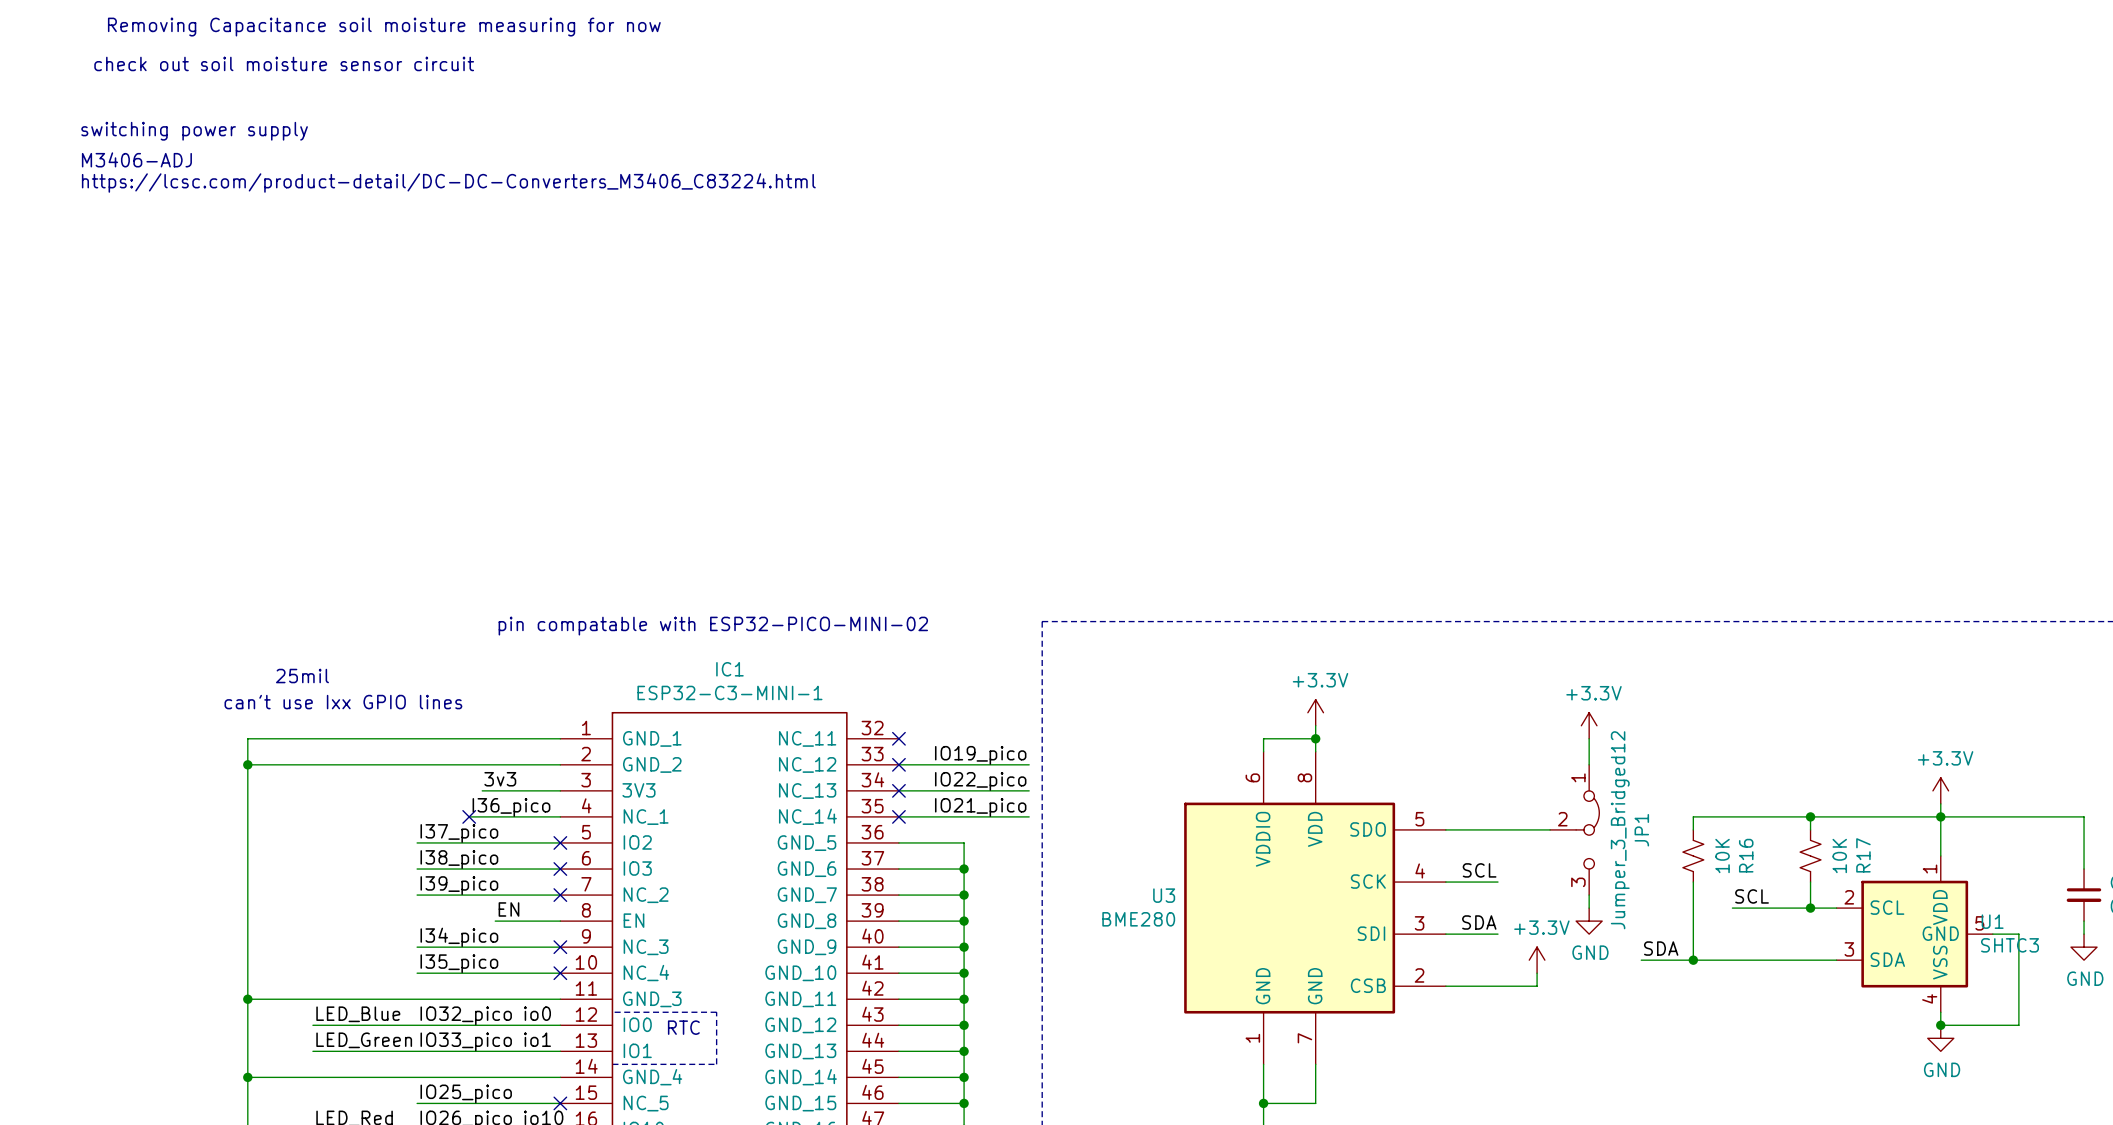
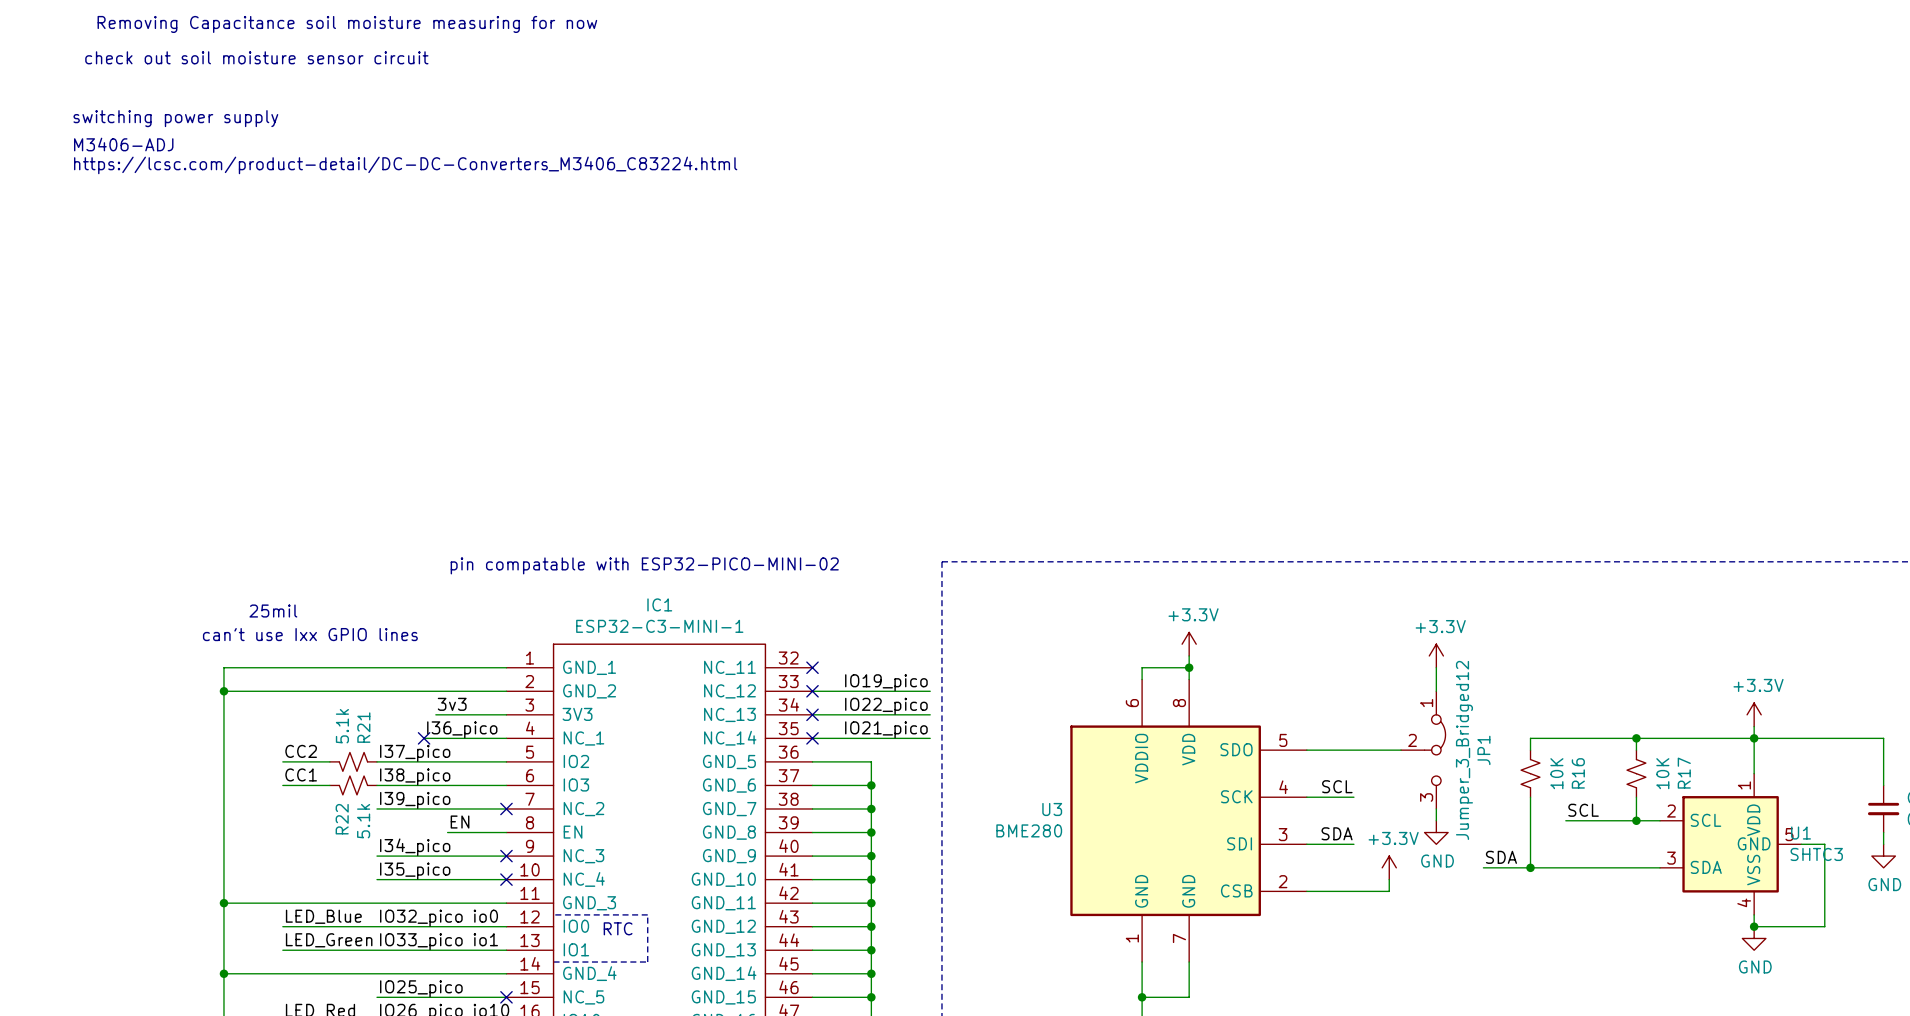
label: none -> CC2 (301, 751)
wire: none -> (282, 761) (329, 761)
R21: none -> 5.1k (353, 761)
no-connect mark: (560, 842) -> none
label: none -> CC1 (301, 774)
wire: none -> (282, 785) (329, 785)
R22: none -> 5.1k (353, 785)
no-connect mark: (560, 869) -> none

